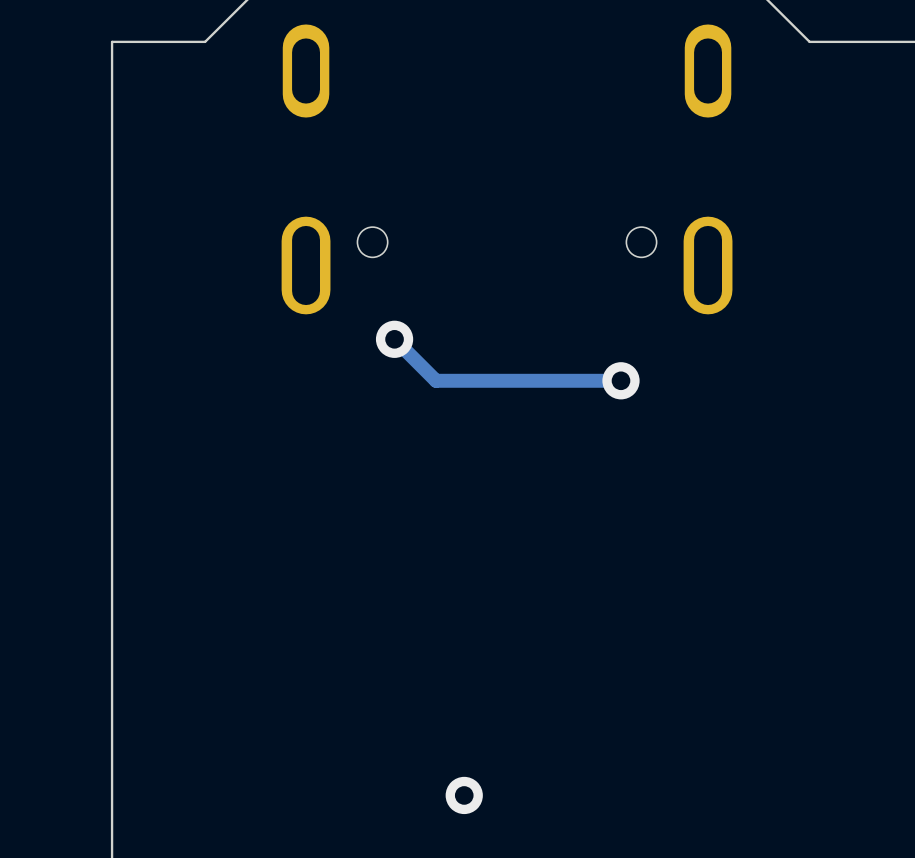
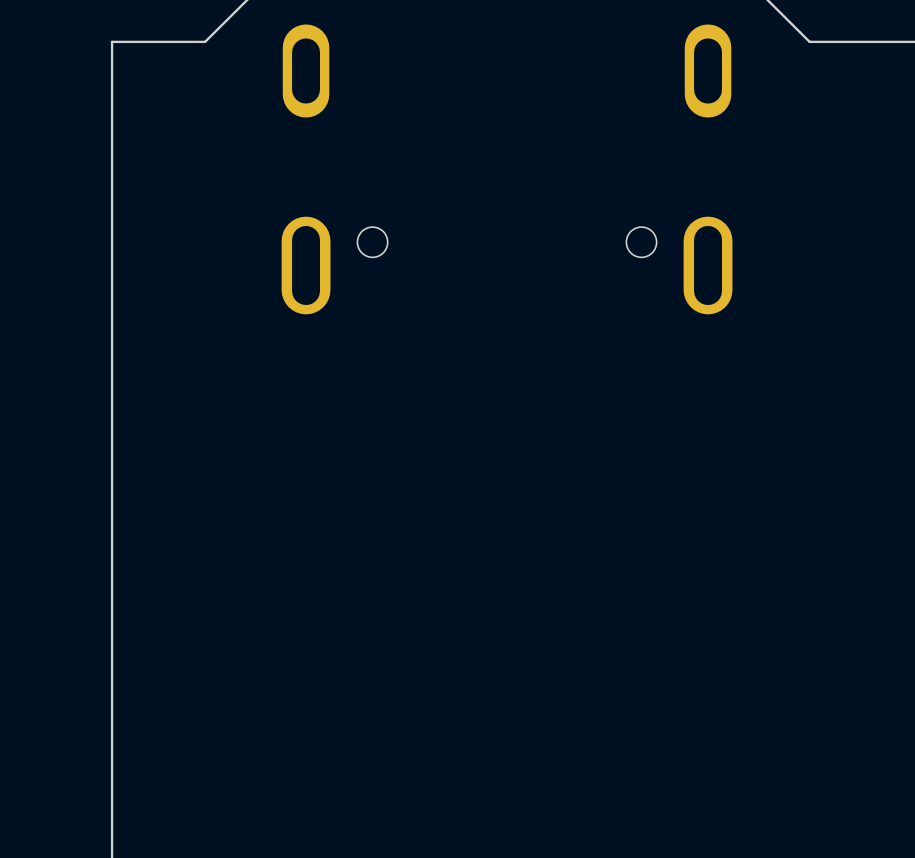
track: (394, 339) (436, 380) (621, 380) -> none
via: (394, 339) -> none
via: (621, 380) -> none
via: (464, 795) -> none

